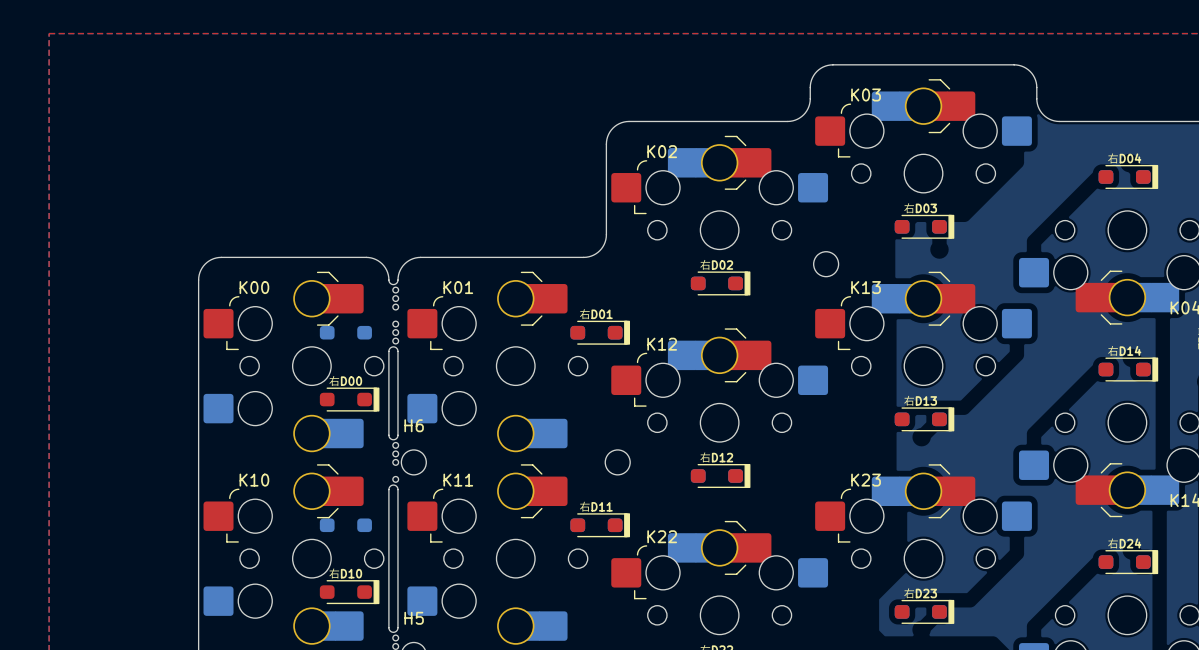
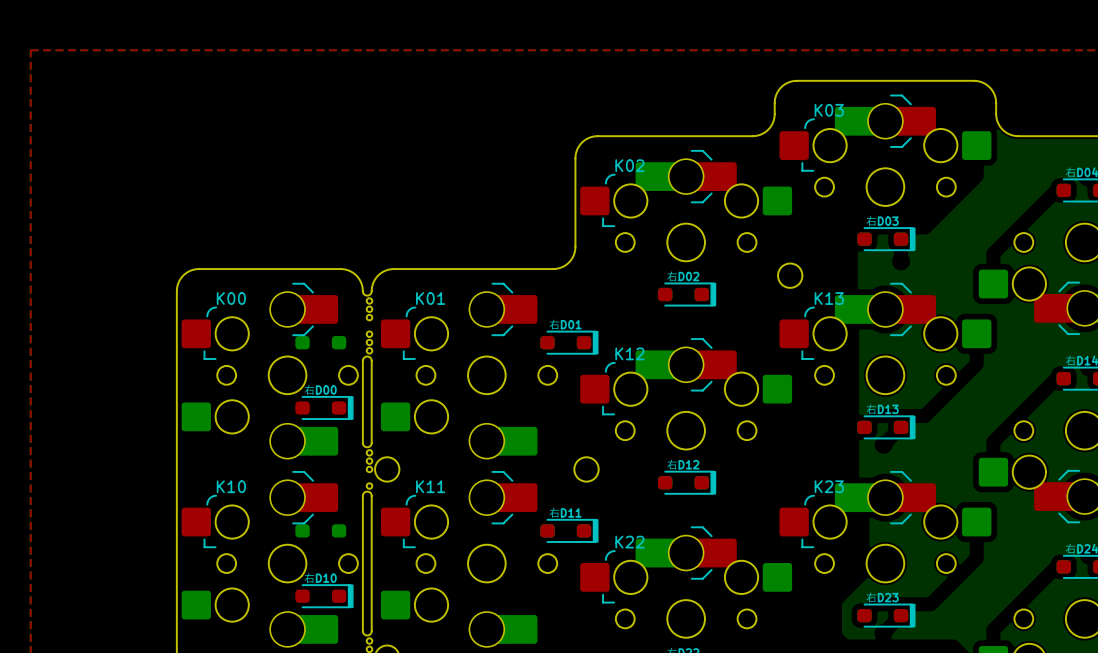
H6 name: H6 (414, 425) -> none
H5 name: H5 (414, 618) -> none

